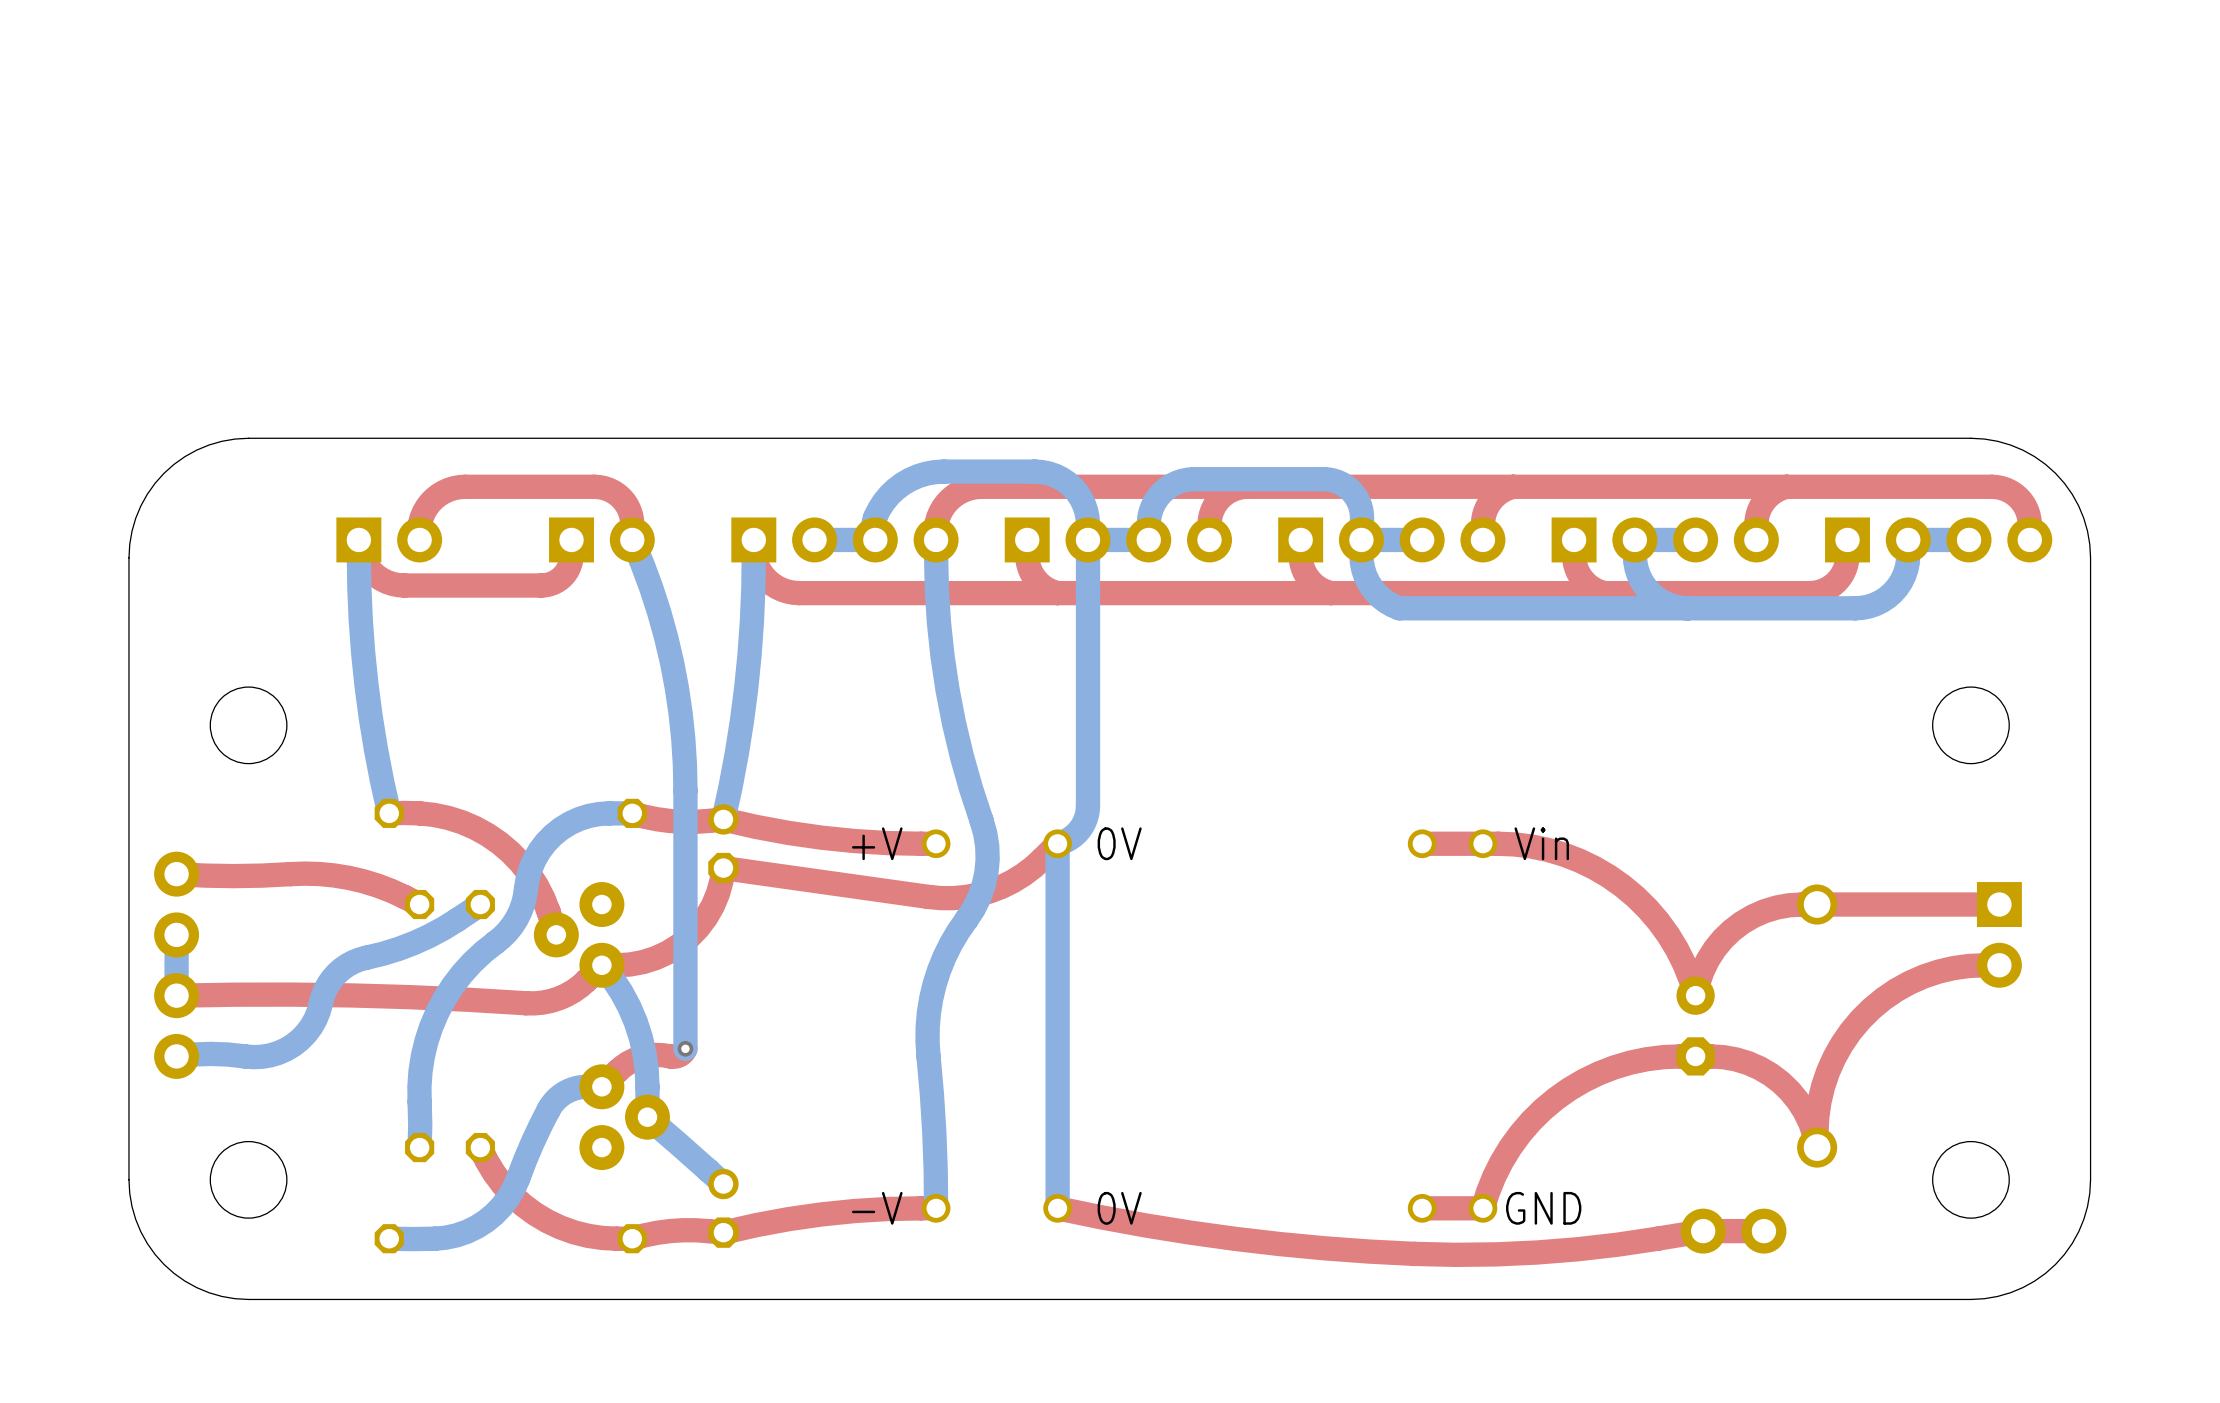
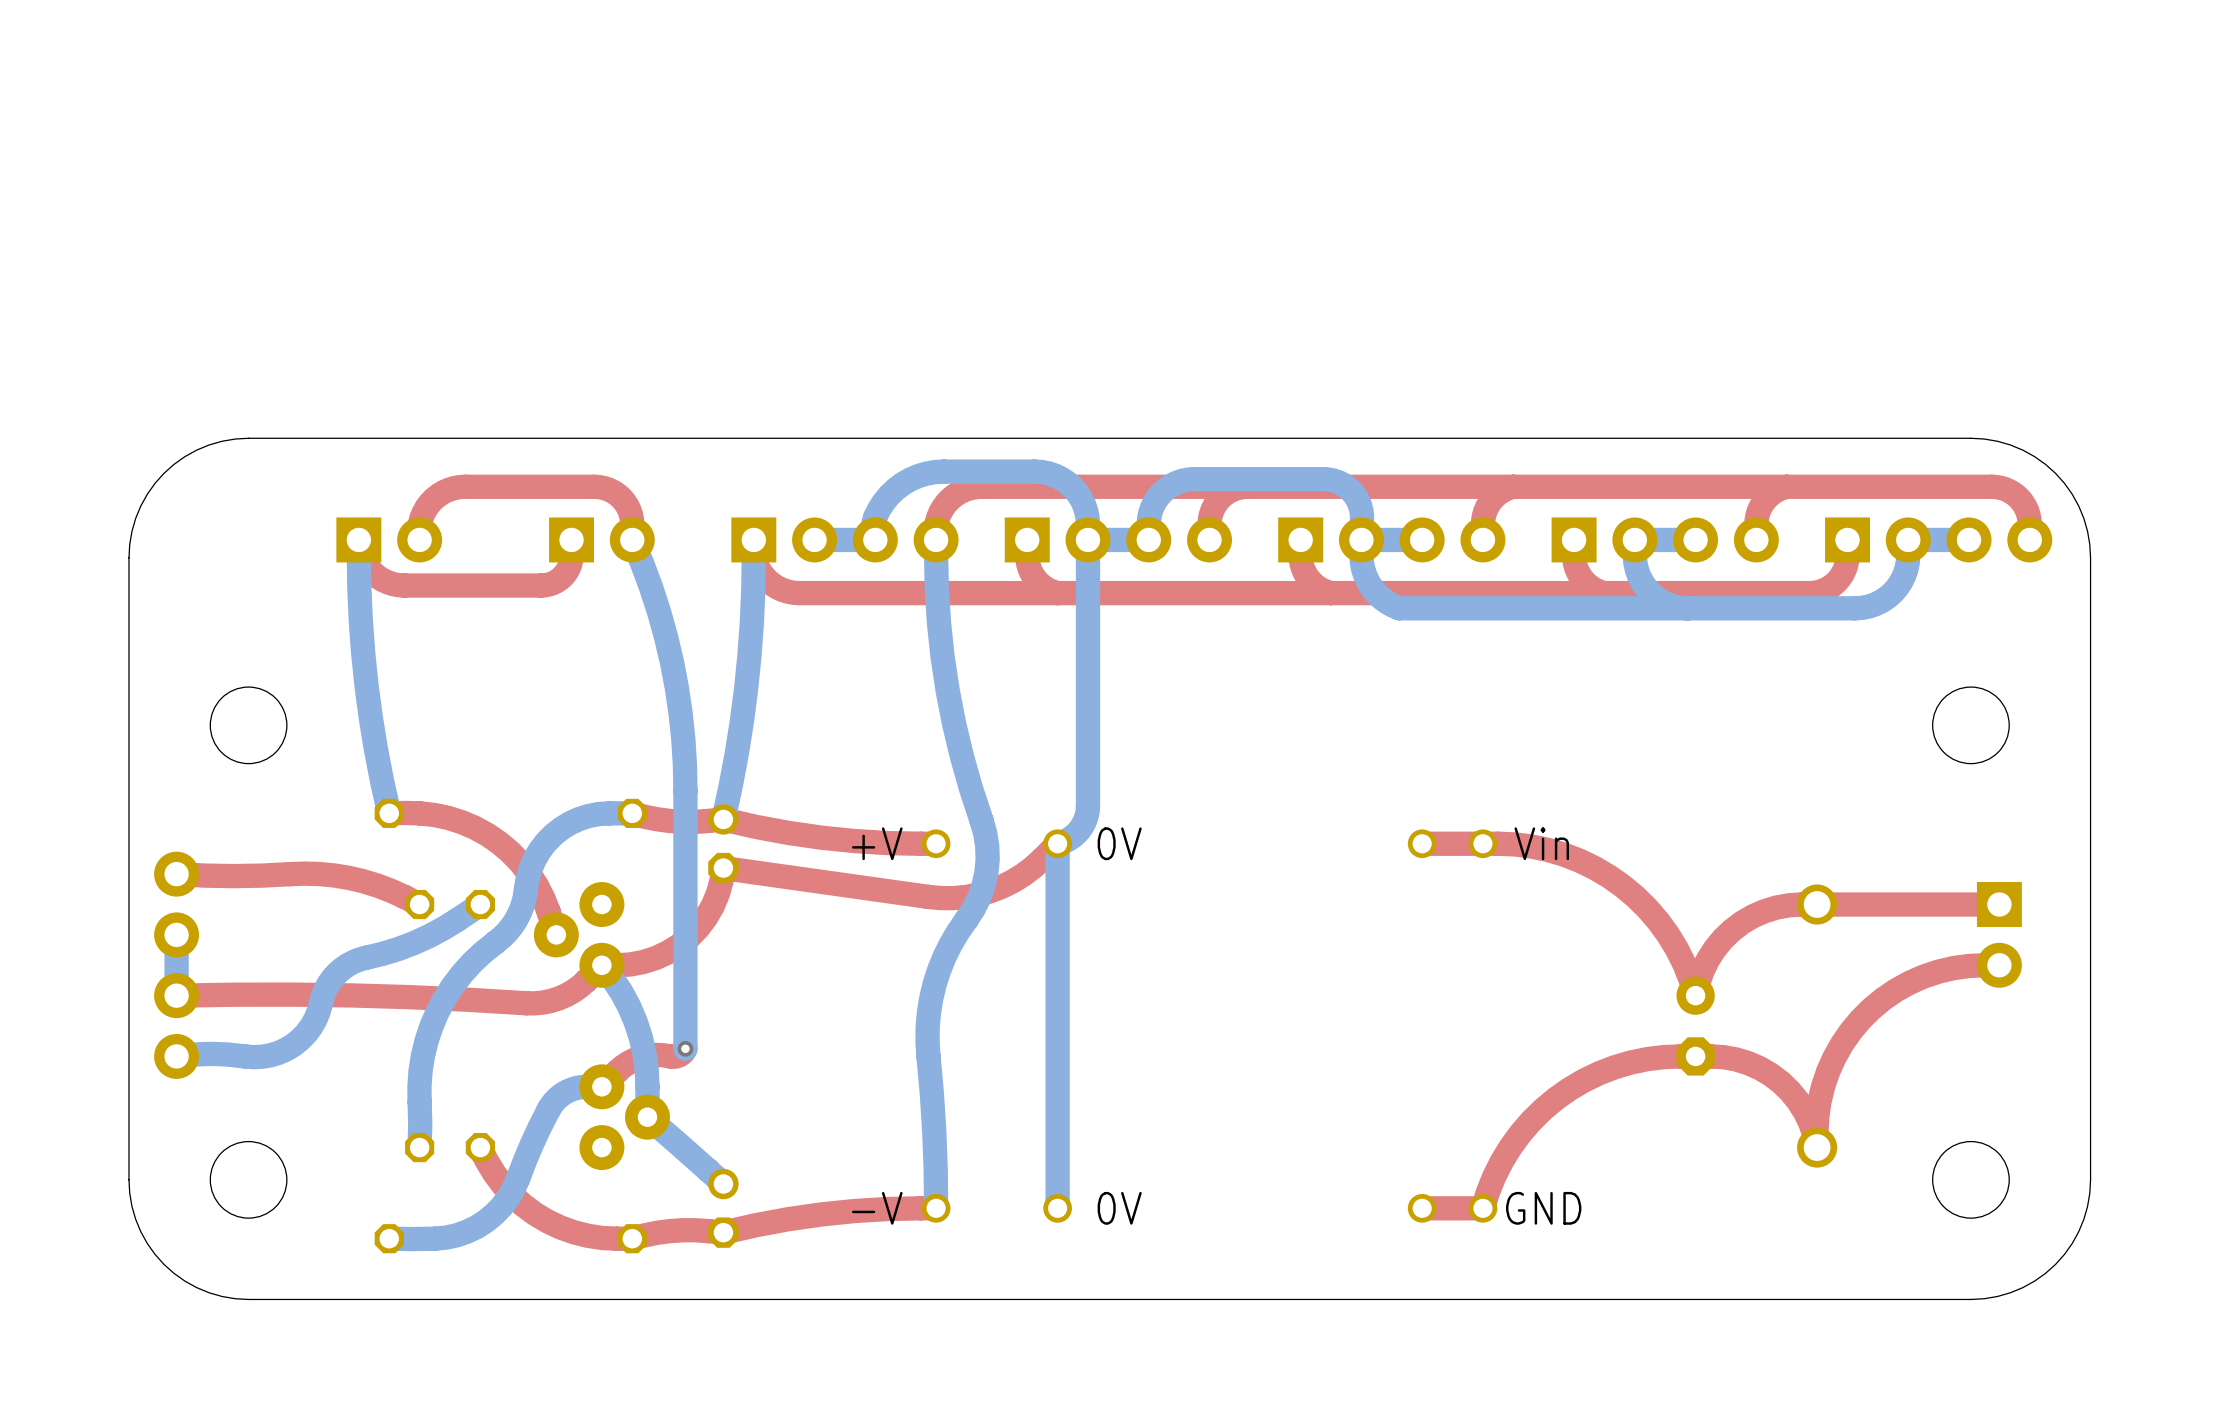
top track: (1057, 1208) (1146, 1225) (1235, 1238) (1324, 1248) (1414, 1253) (1536, 1252) (1617, 1244) (1703, 1231) (1763, 1231) -> none
part: (1733, 1231) -> none

